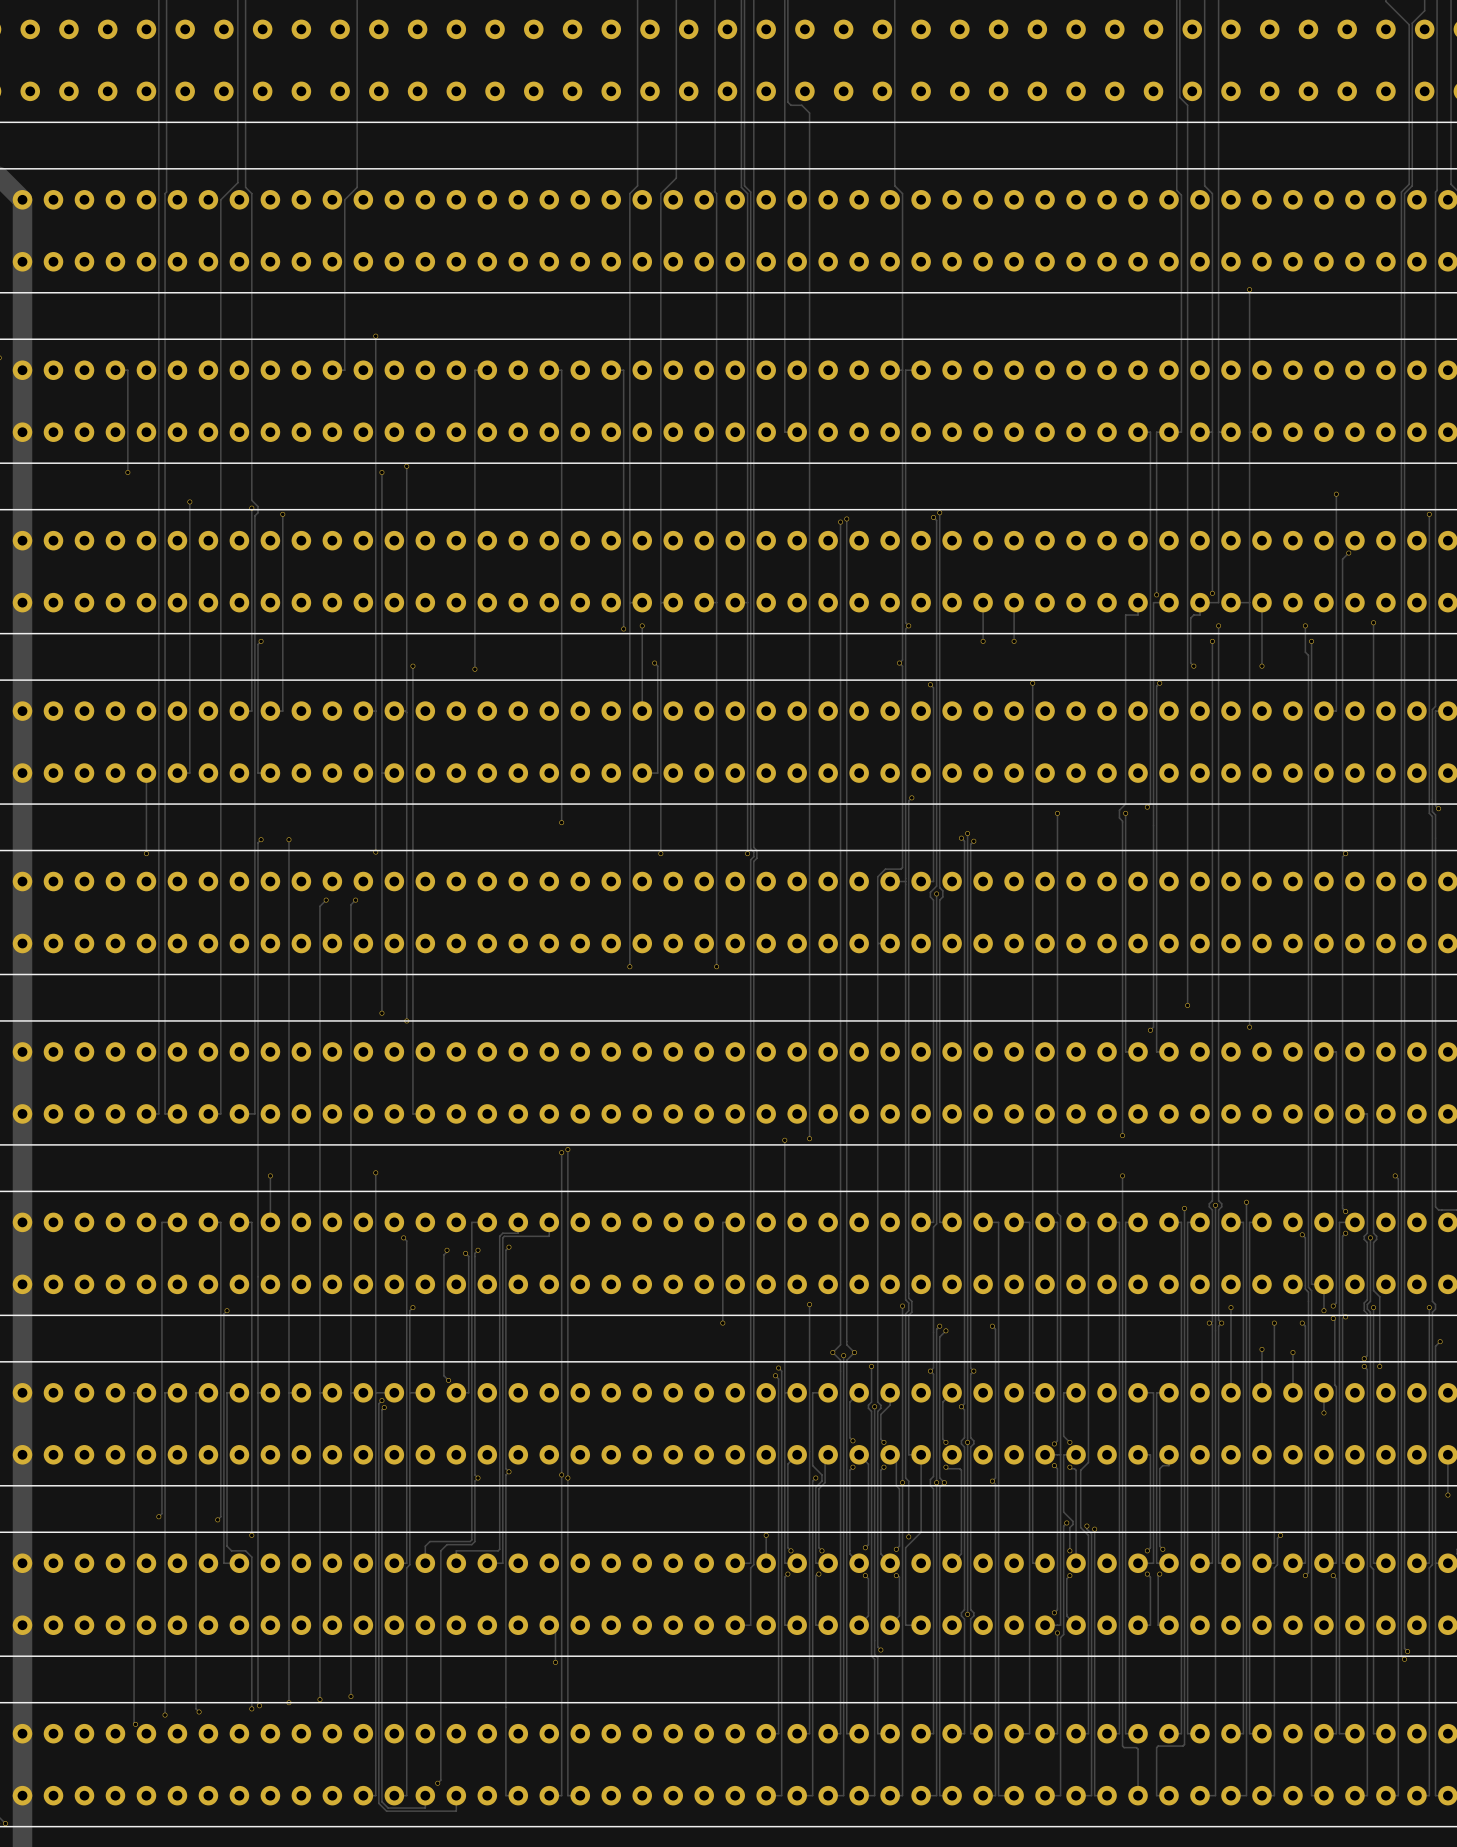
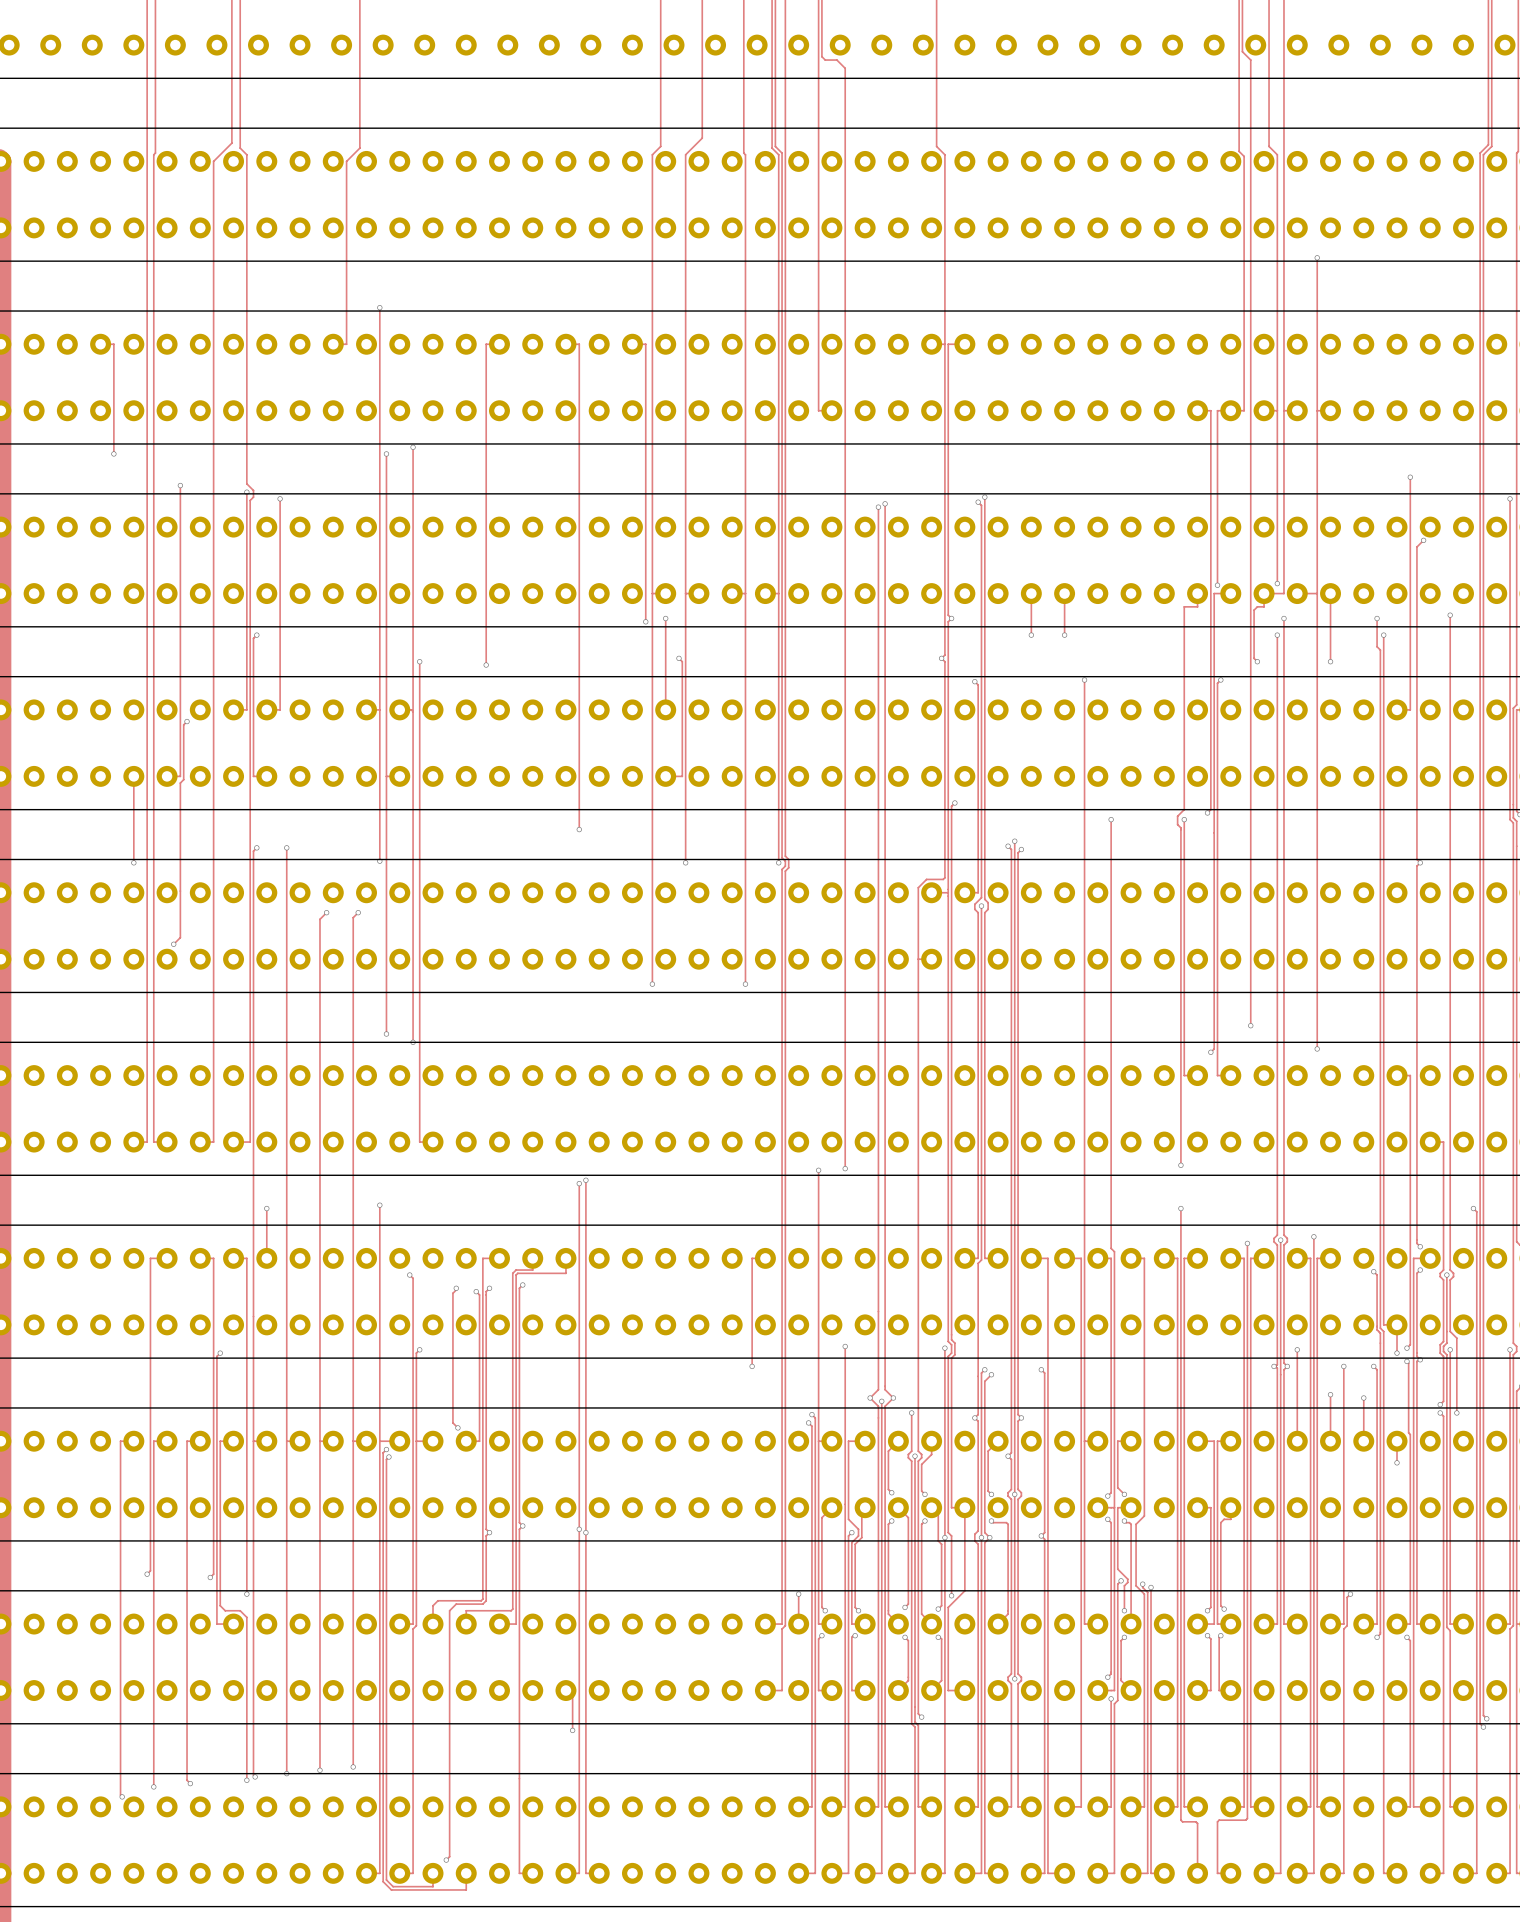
track: none -> (187, 721) (183, 724) (183, 779) (180, 783) (180, 937) (173, 944)
via: none -> (187, 721)
via: none -> (173, 944)

